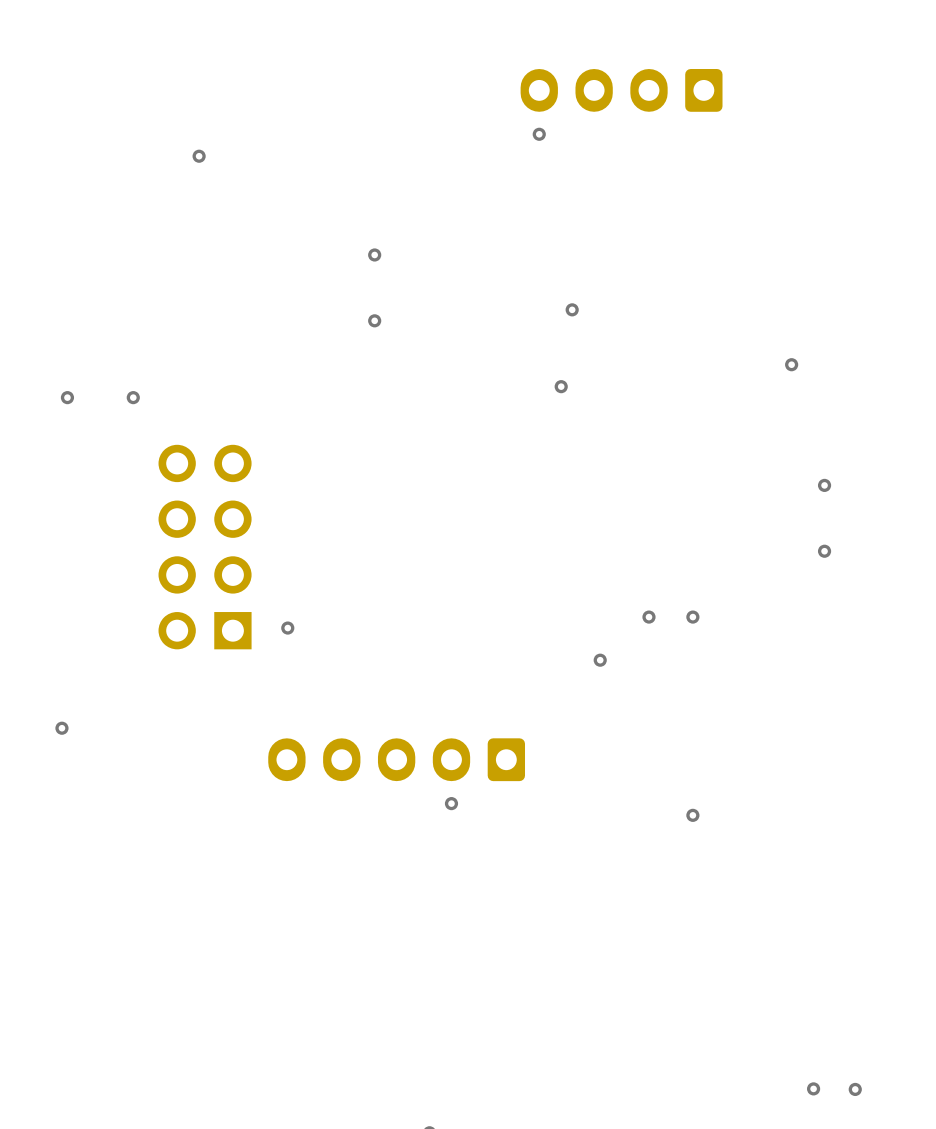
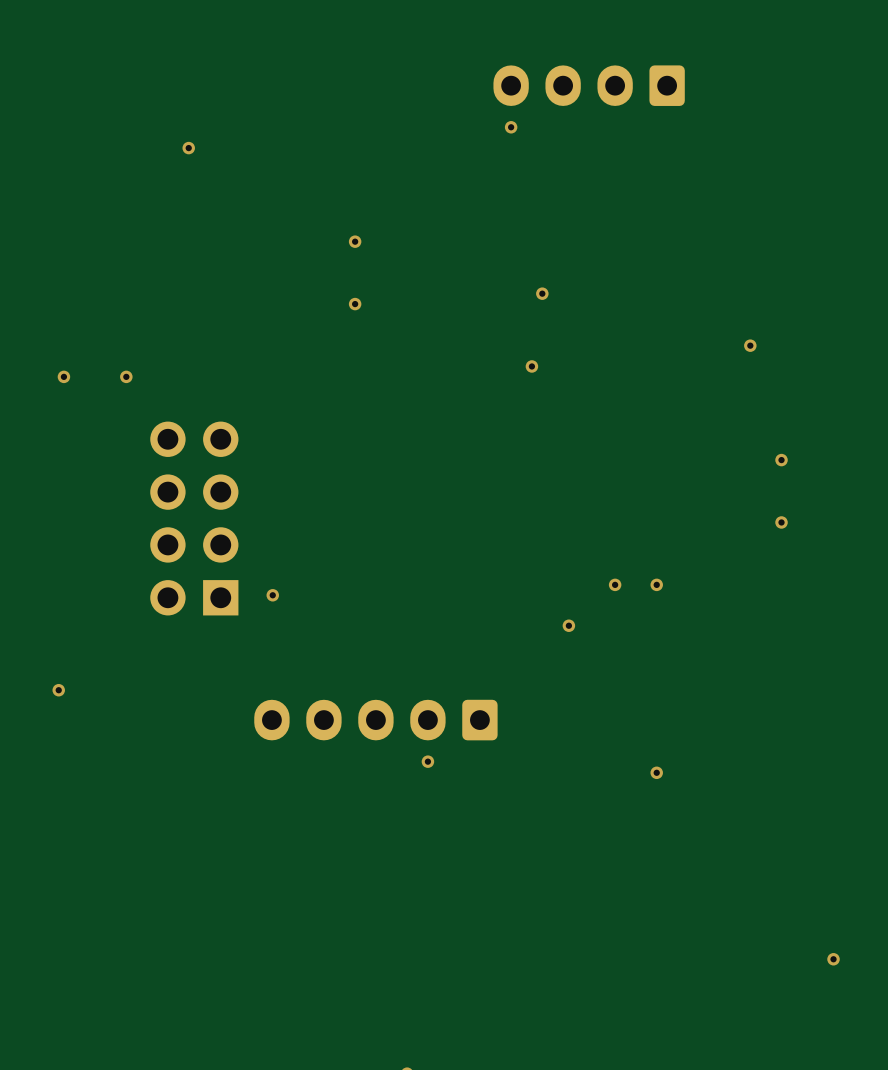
via: none -> (833, 959)
via: (813, 1088) -> none
via: (855, 1089) -> none

